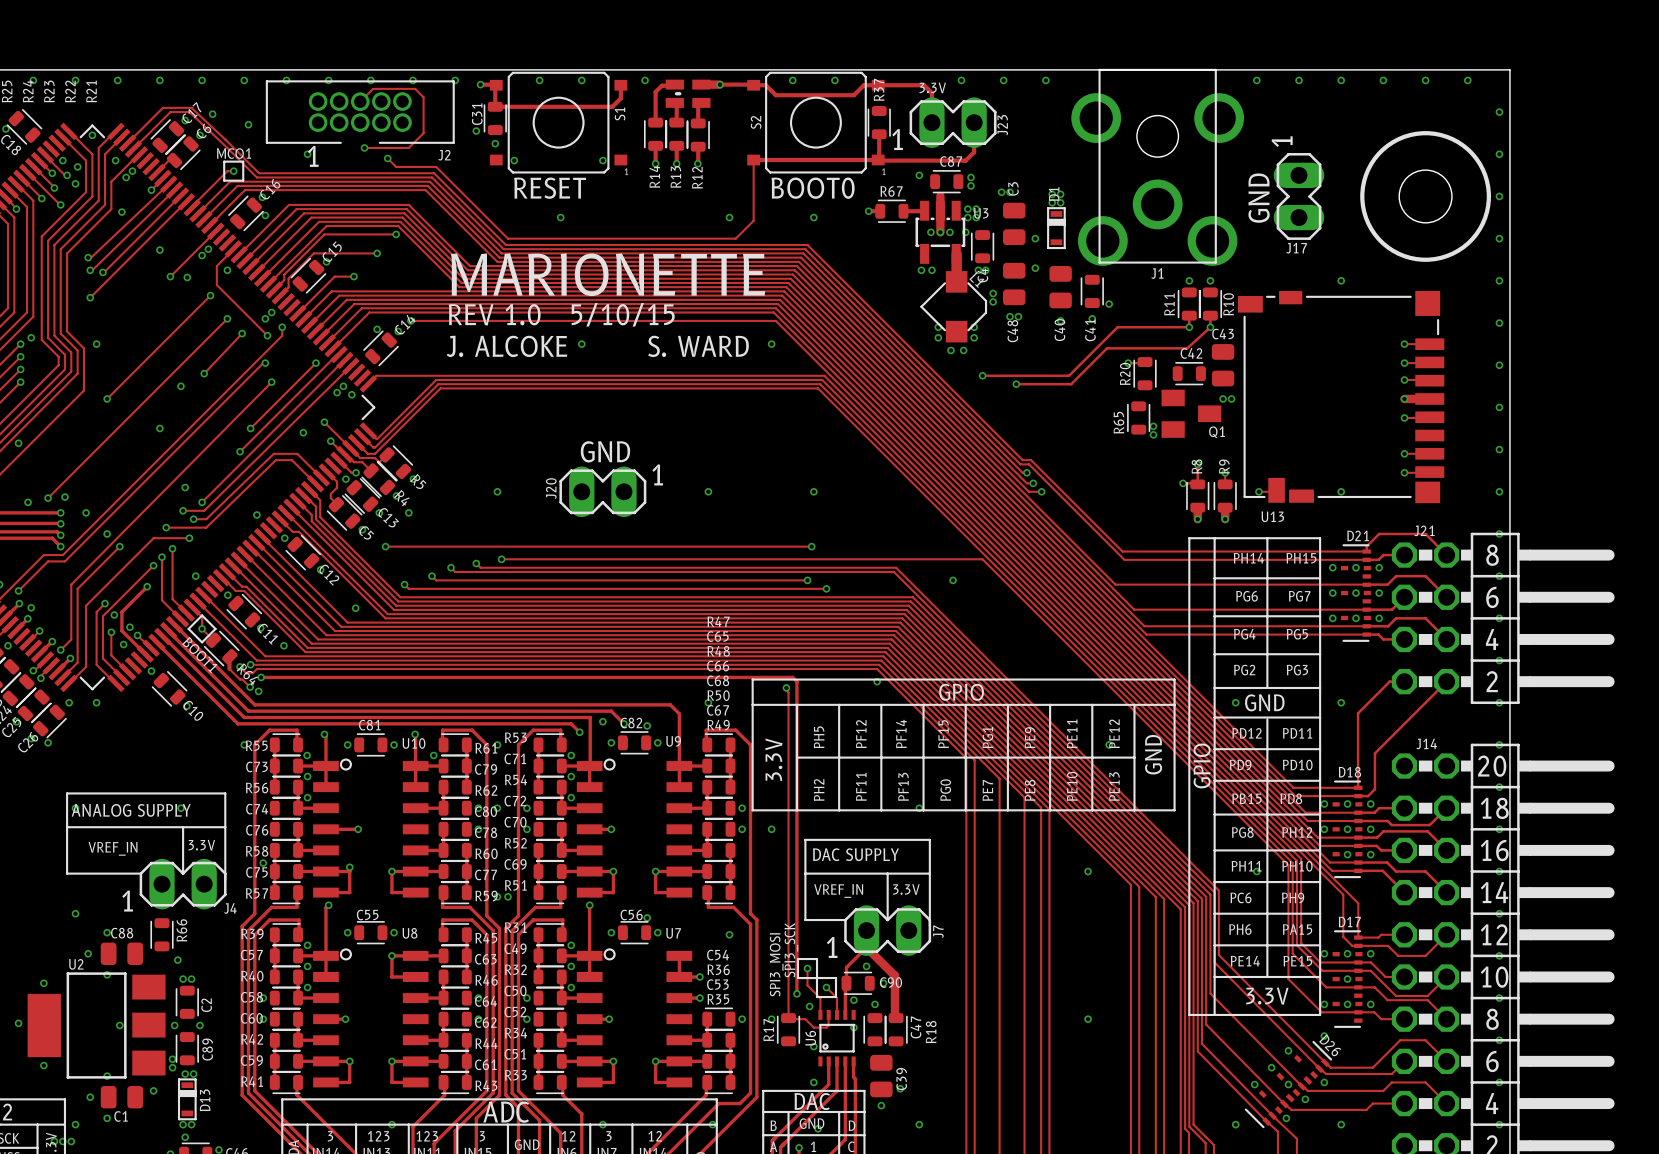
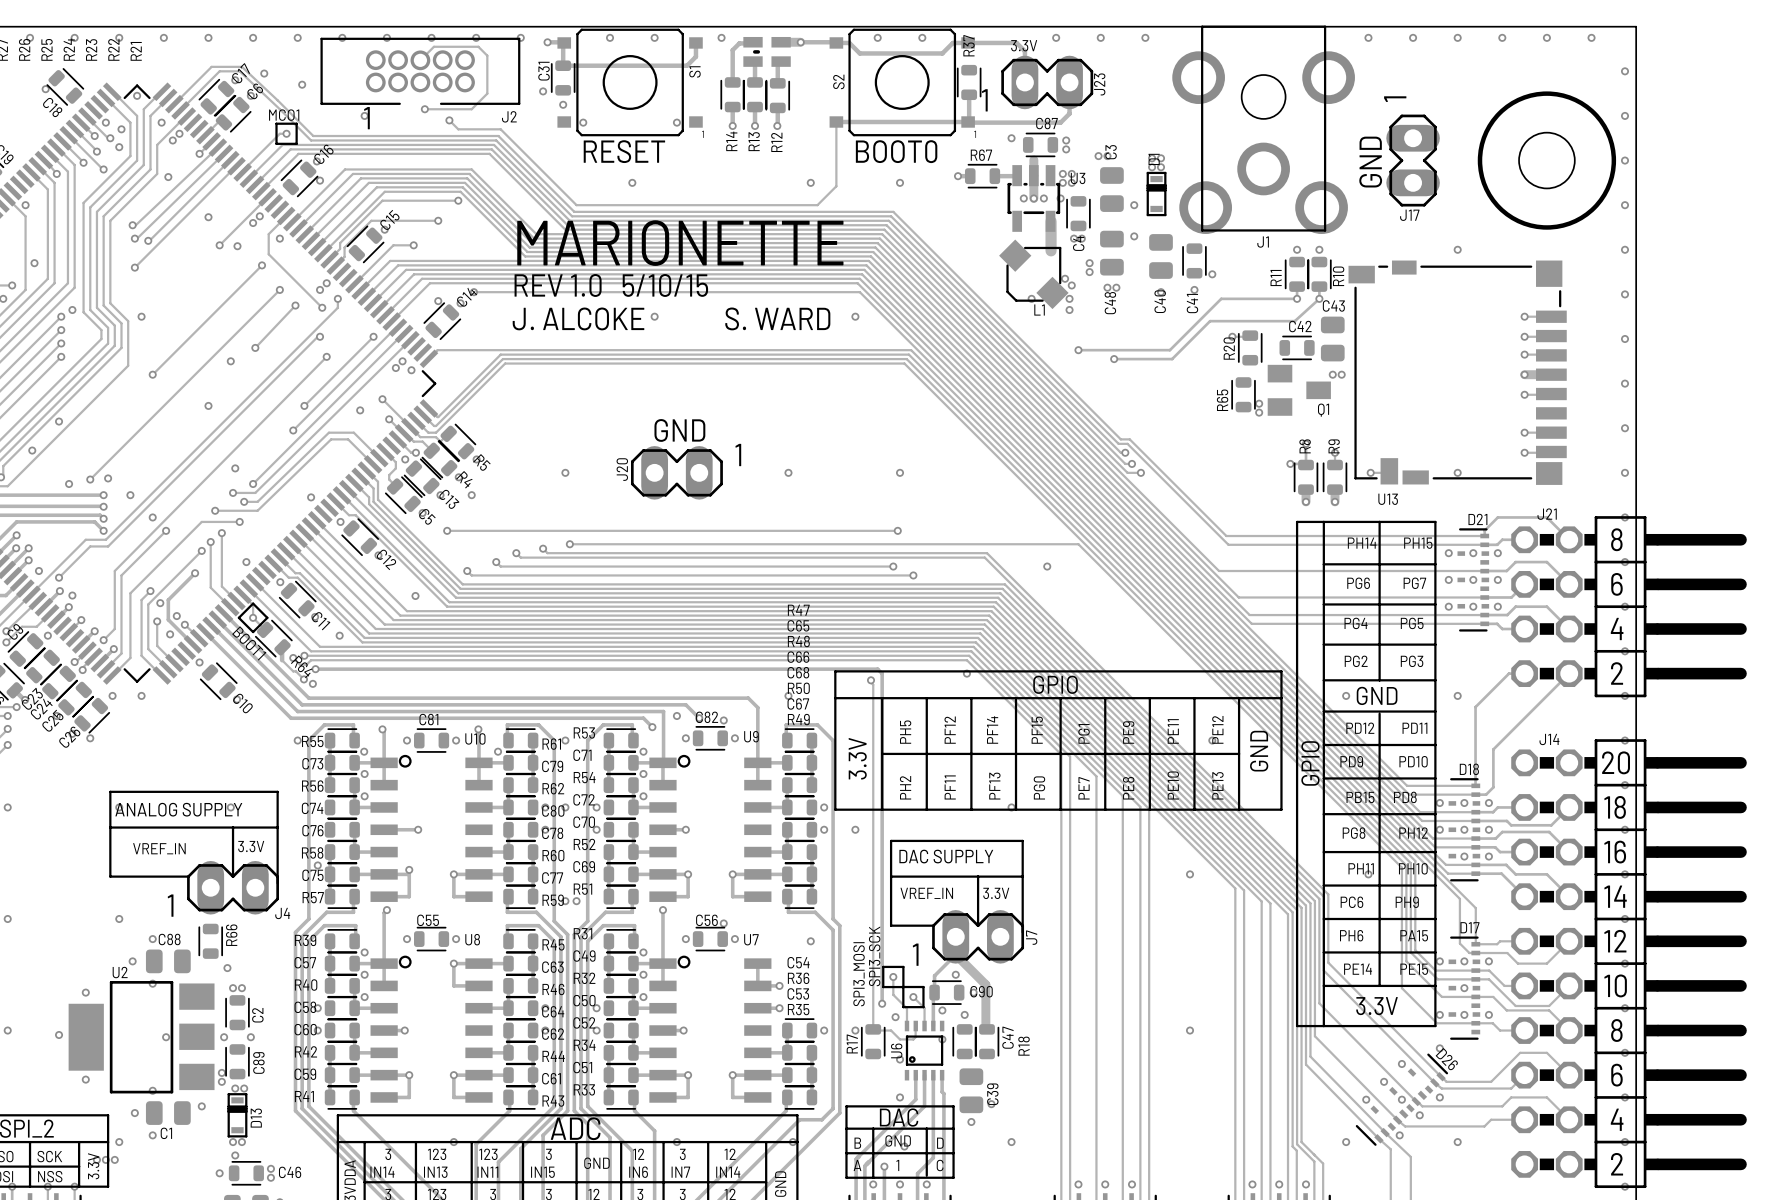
via: (921, 270) -> none
via: (931, 270) -> none
L1 rotation: 0° (953, 306) -> 135° clockwise (1033, 274)
via: none -> (1065, 278)
via: none -> (1071, 285)
via: (938, 337) -> none
via: (950, 350) -> none
via: (963, 350) -> none

